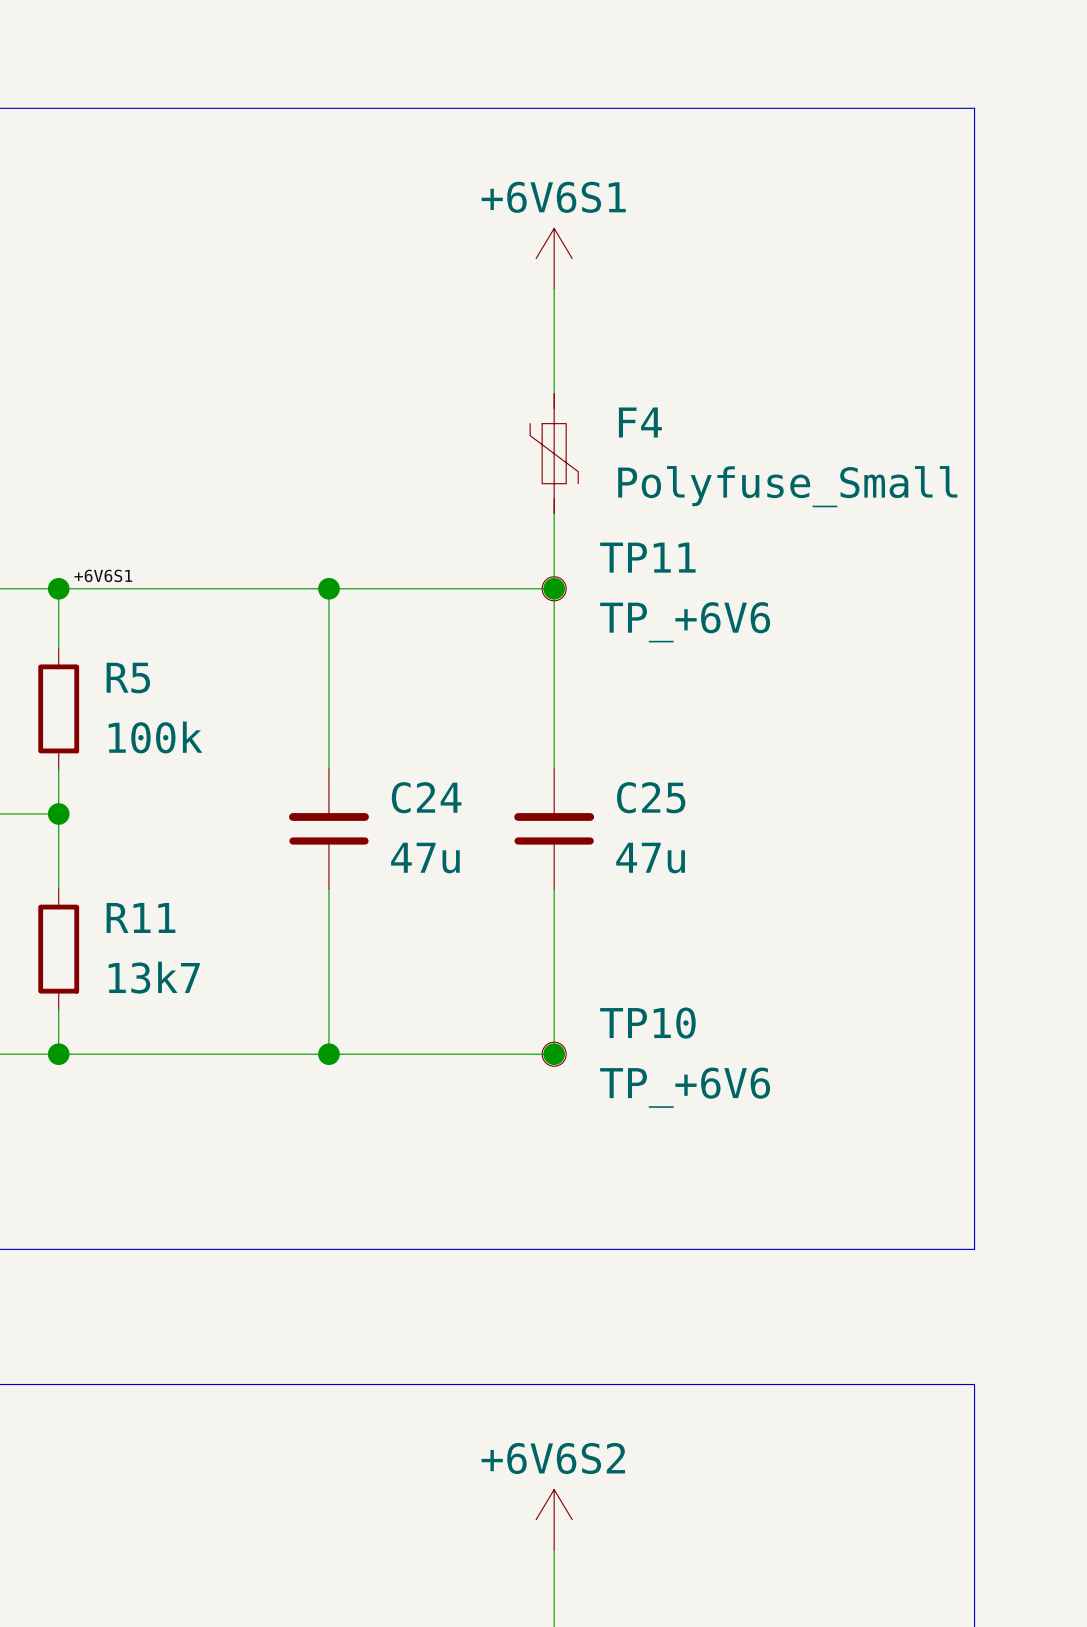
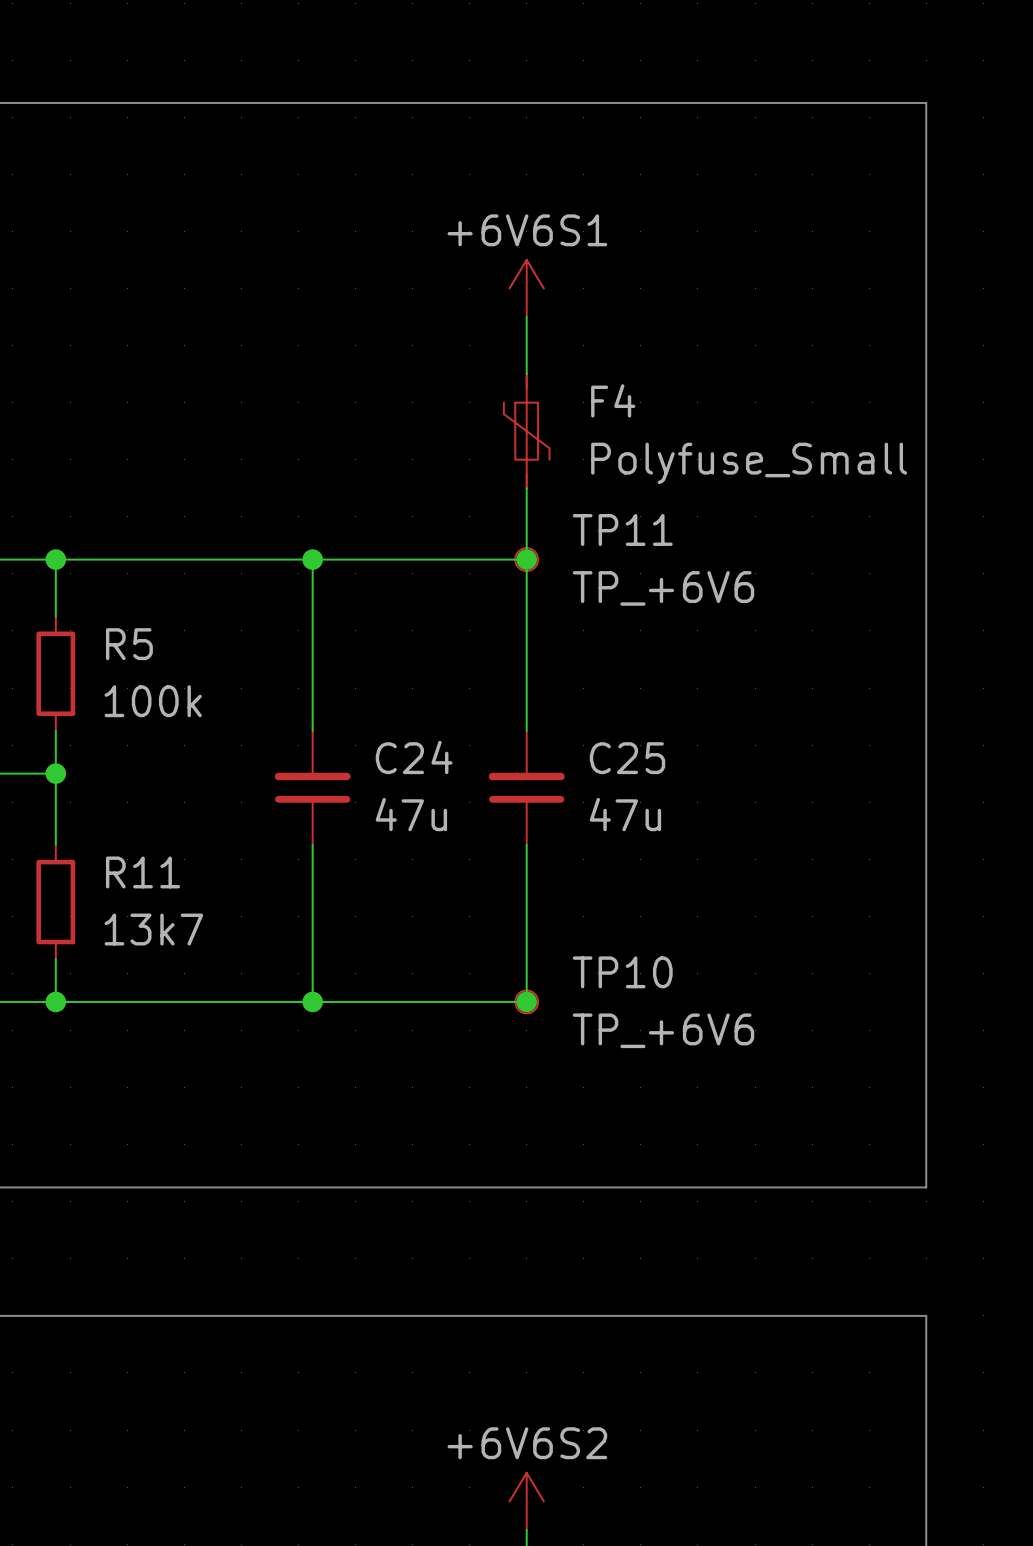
power symbol position: +6V6S1 (554, 258) -> +6V6S1 (526, 288)
label: +6V6S1 (103, 575) -> none
power symbol position: +6V6S2 (554, 1519) -> +6V6S2 (526, 1501)

